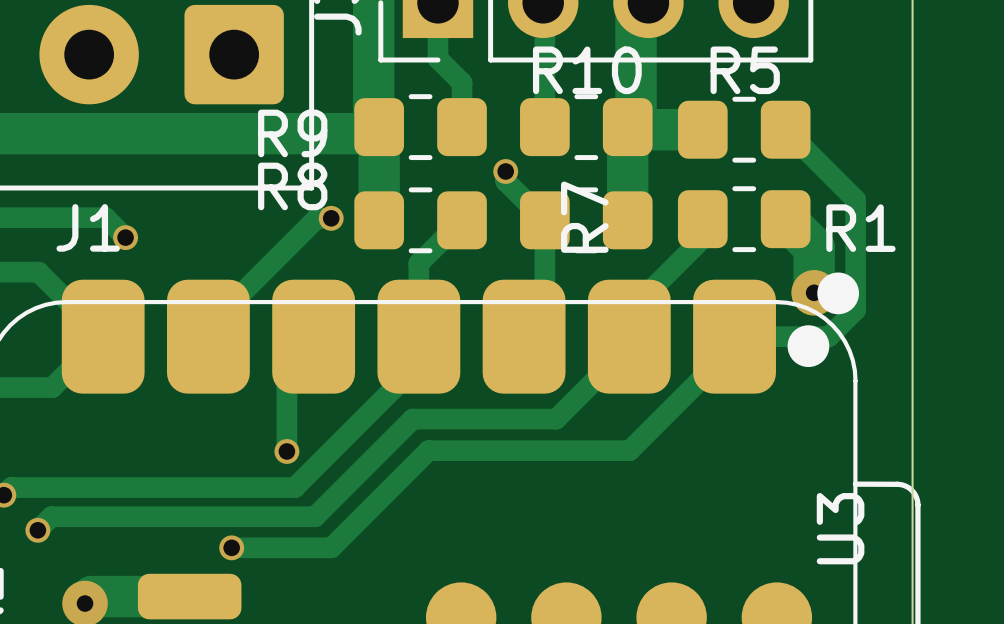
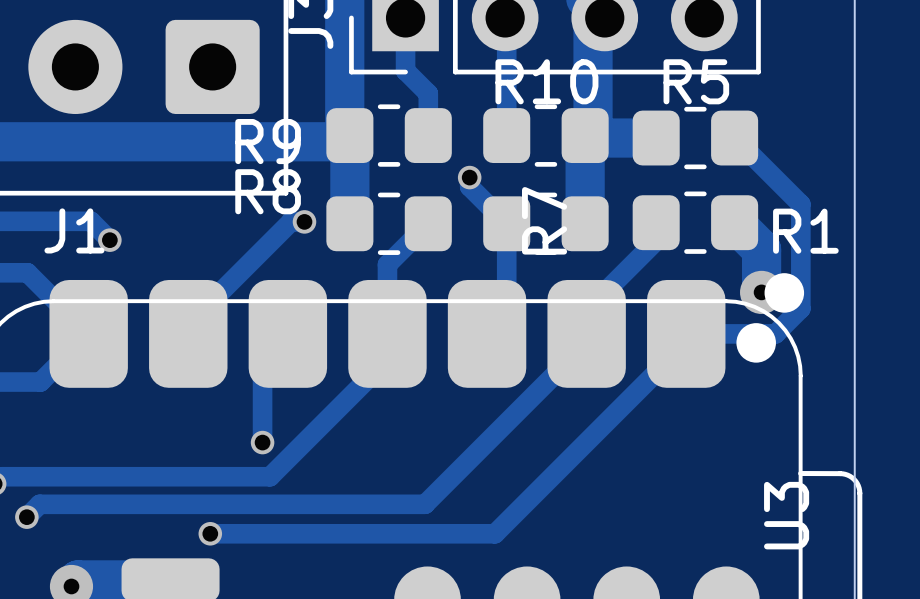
track: (556, 419) (412, 419) (315, 516) -> (517, 411) (425, 504) (289, 504)
track: (629, 450) (428, 450) (331, 547) -> (586, 441) (494, 533) (304, 533)

